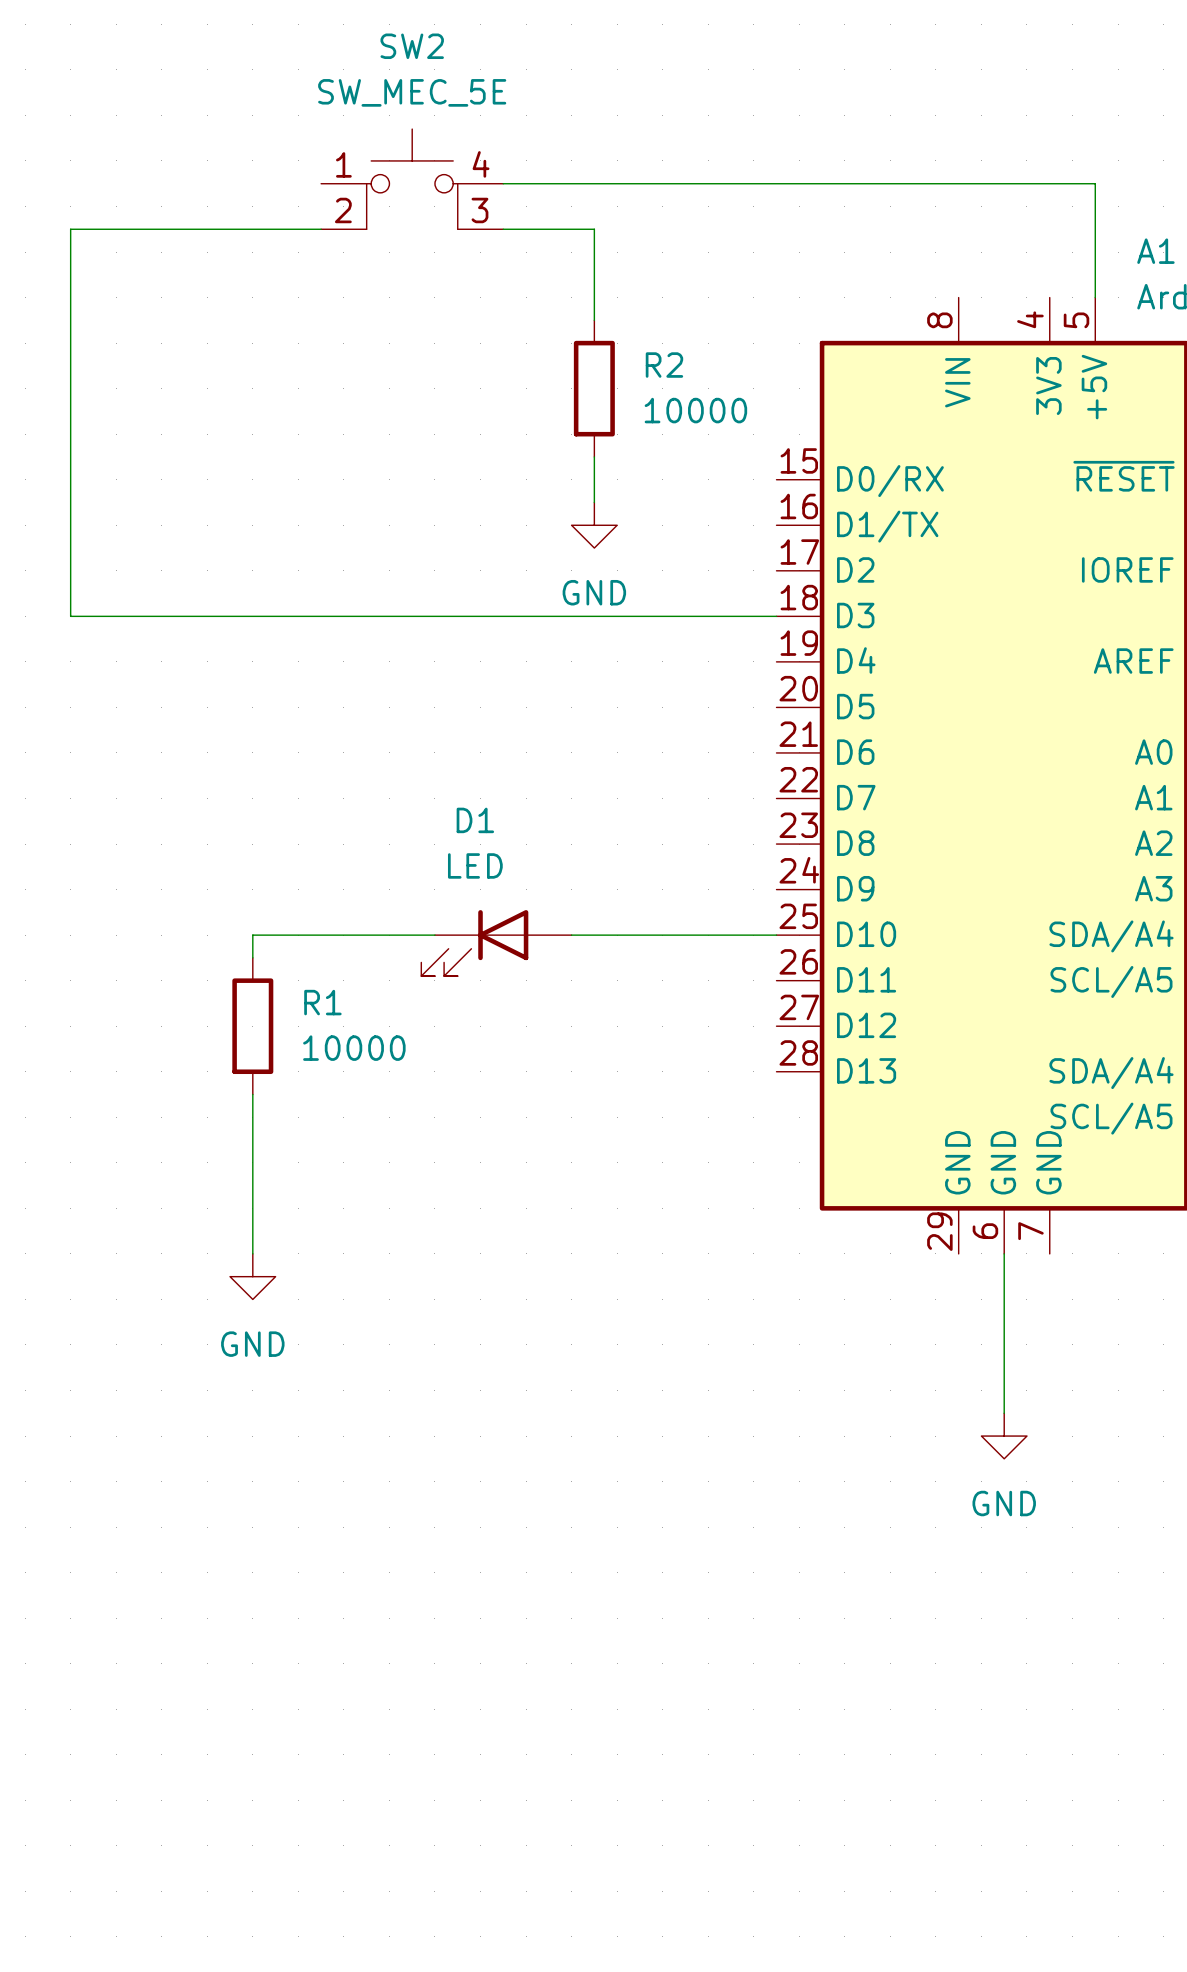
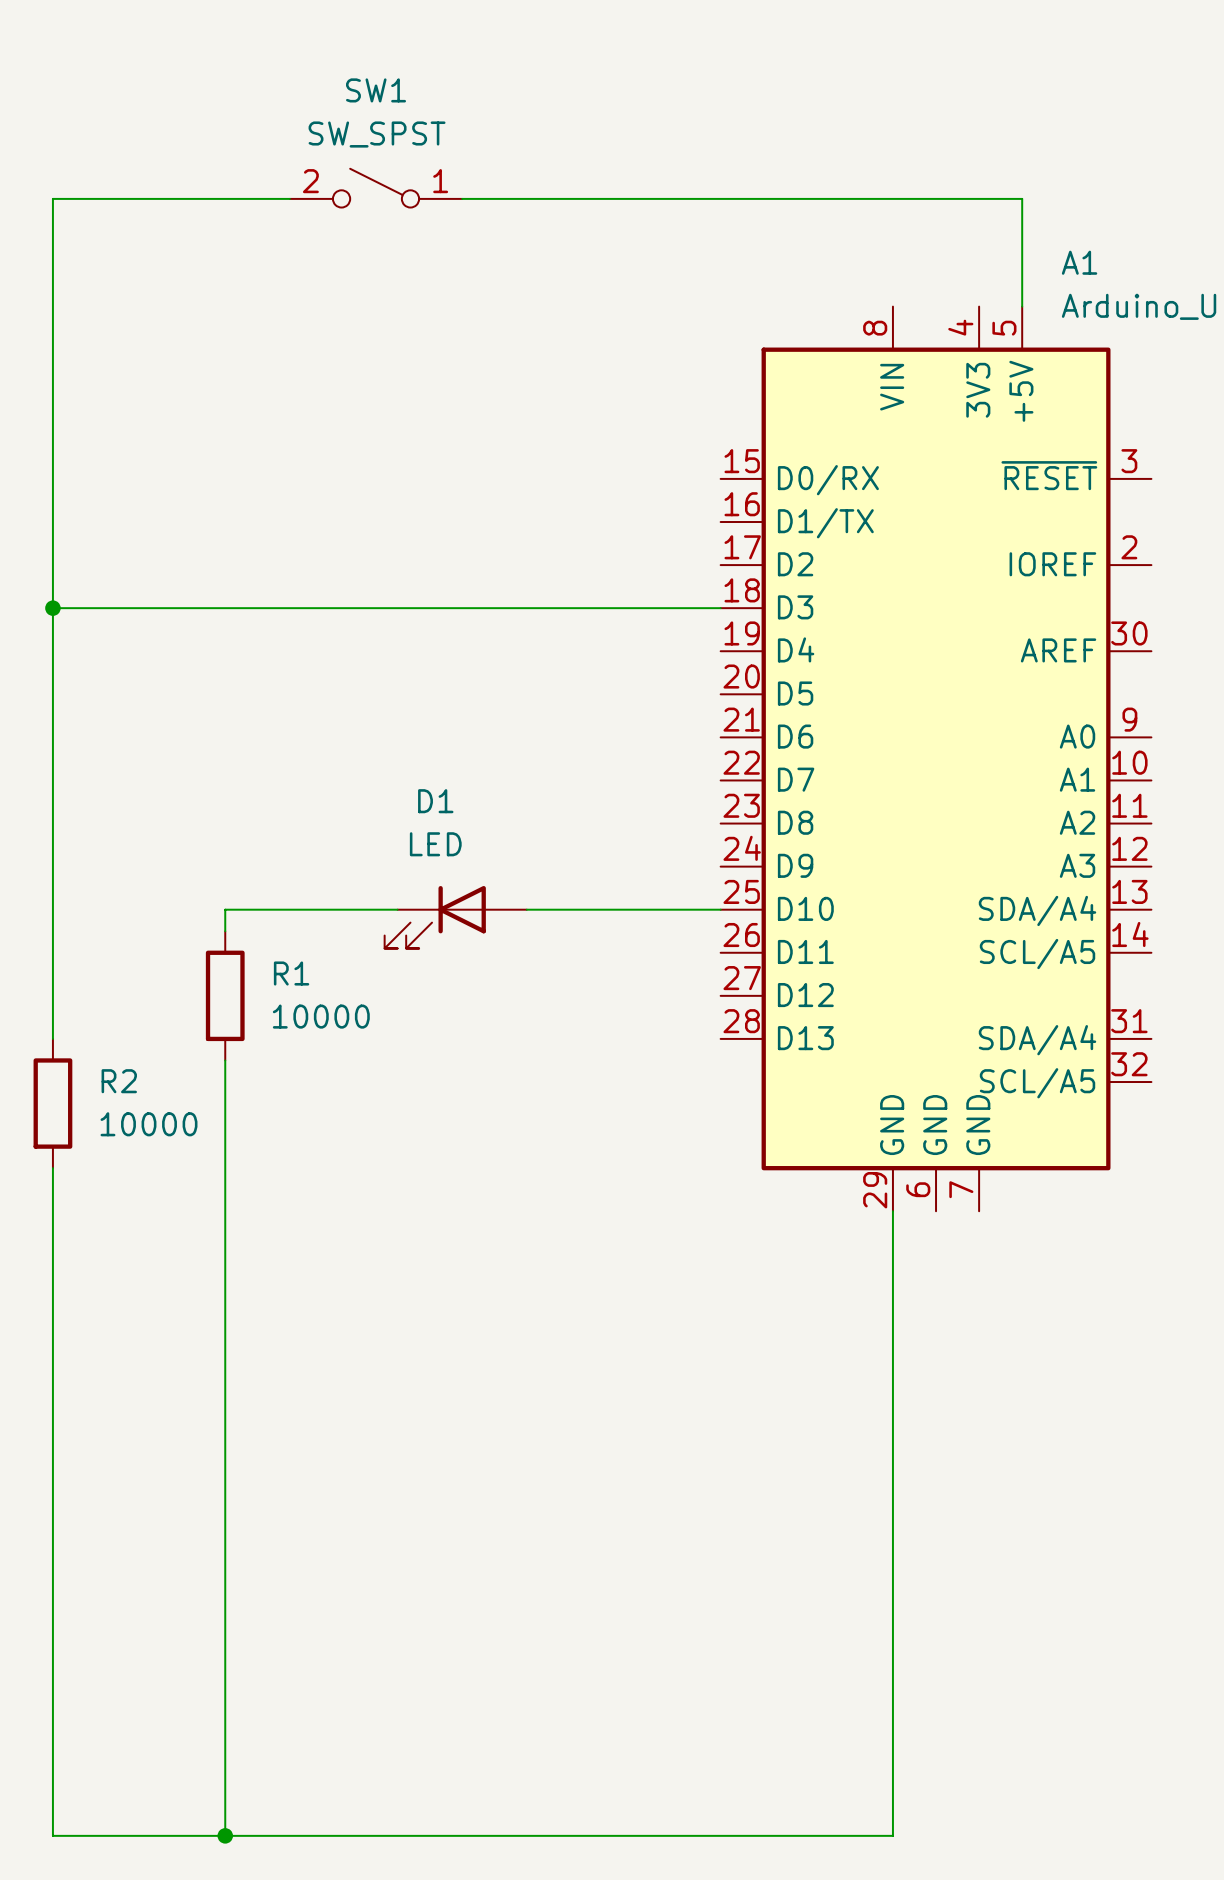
SW1: none -> SW_SPST (376, 188)
SW2: SW_MEC_5E (412, 179) -> none
wire: (70, 229) (321, 229) -> (52, 241) (52, 198) (289, 198)
wire: (503, 229) (594, 229) (594, 320) -> none
R2 position: (594, 388) -> (52, 1103)
wire: (594, 456) (594, 502) -> none
power symbol: GND (594, 525) -> none
wire: none -> (52, 608) (52, 1038)
junction: none -> (52, 608)
wire: none -> (52, 1168) (52, 1835) (892, 1835) (892, 1211)
wire: none -> (225, 1211) (225, 1835)
wire: (1004, 1253) (1004, 1413) -> none
power symbol: GND (252, 1276) -> none
power symbol: GND (1004, 1436) -> none
junction: none -> (225, 1835)

